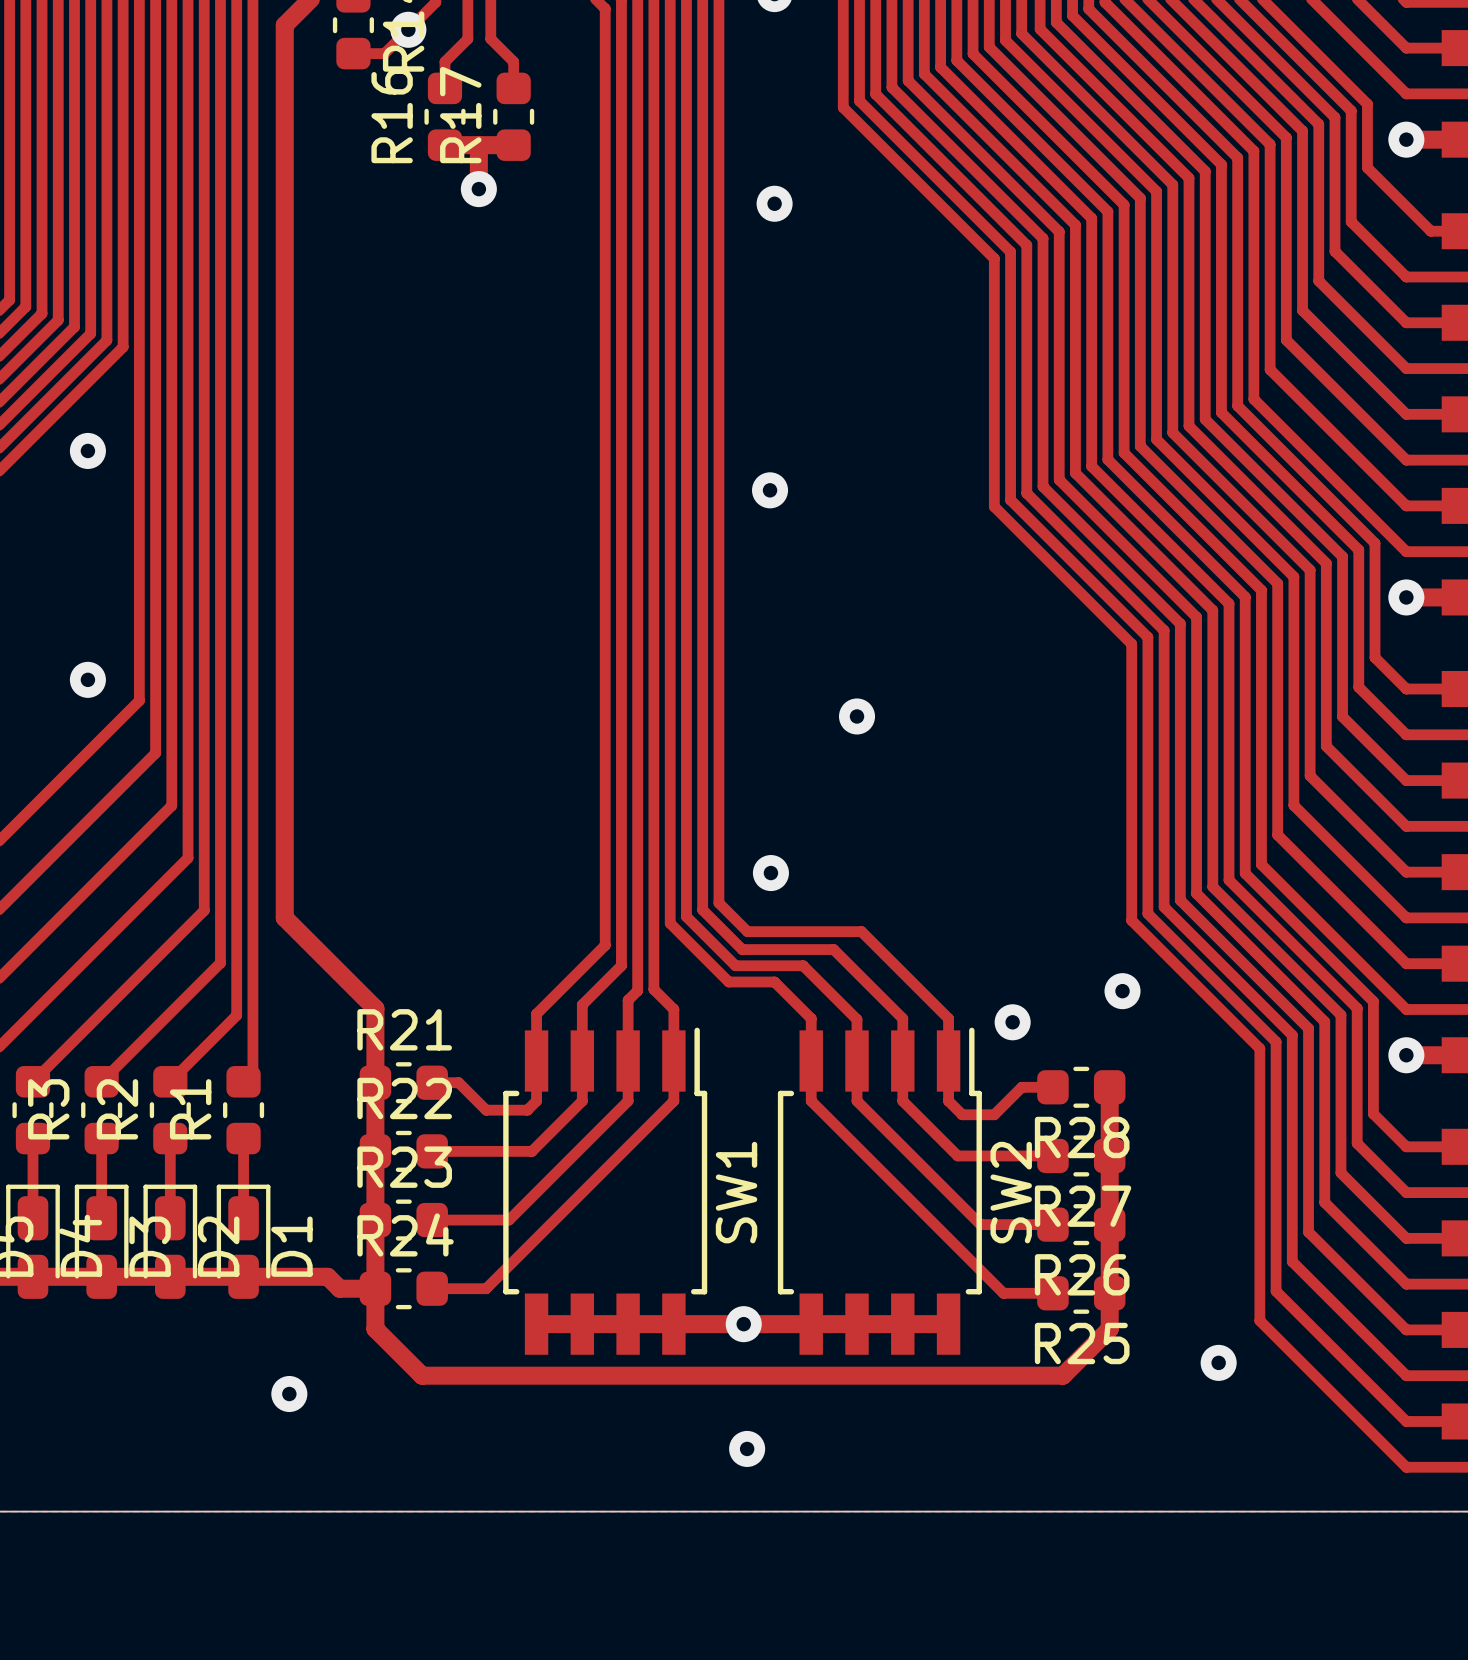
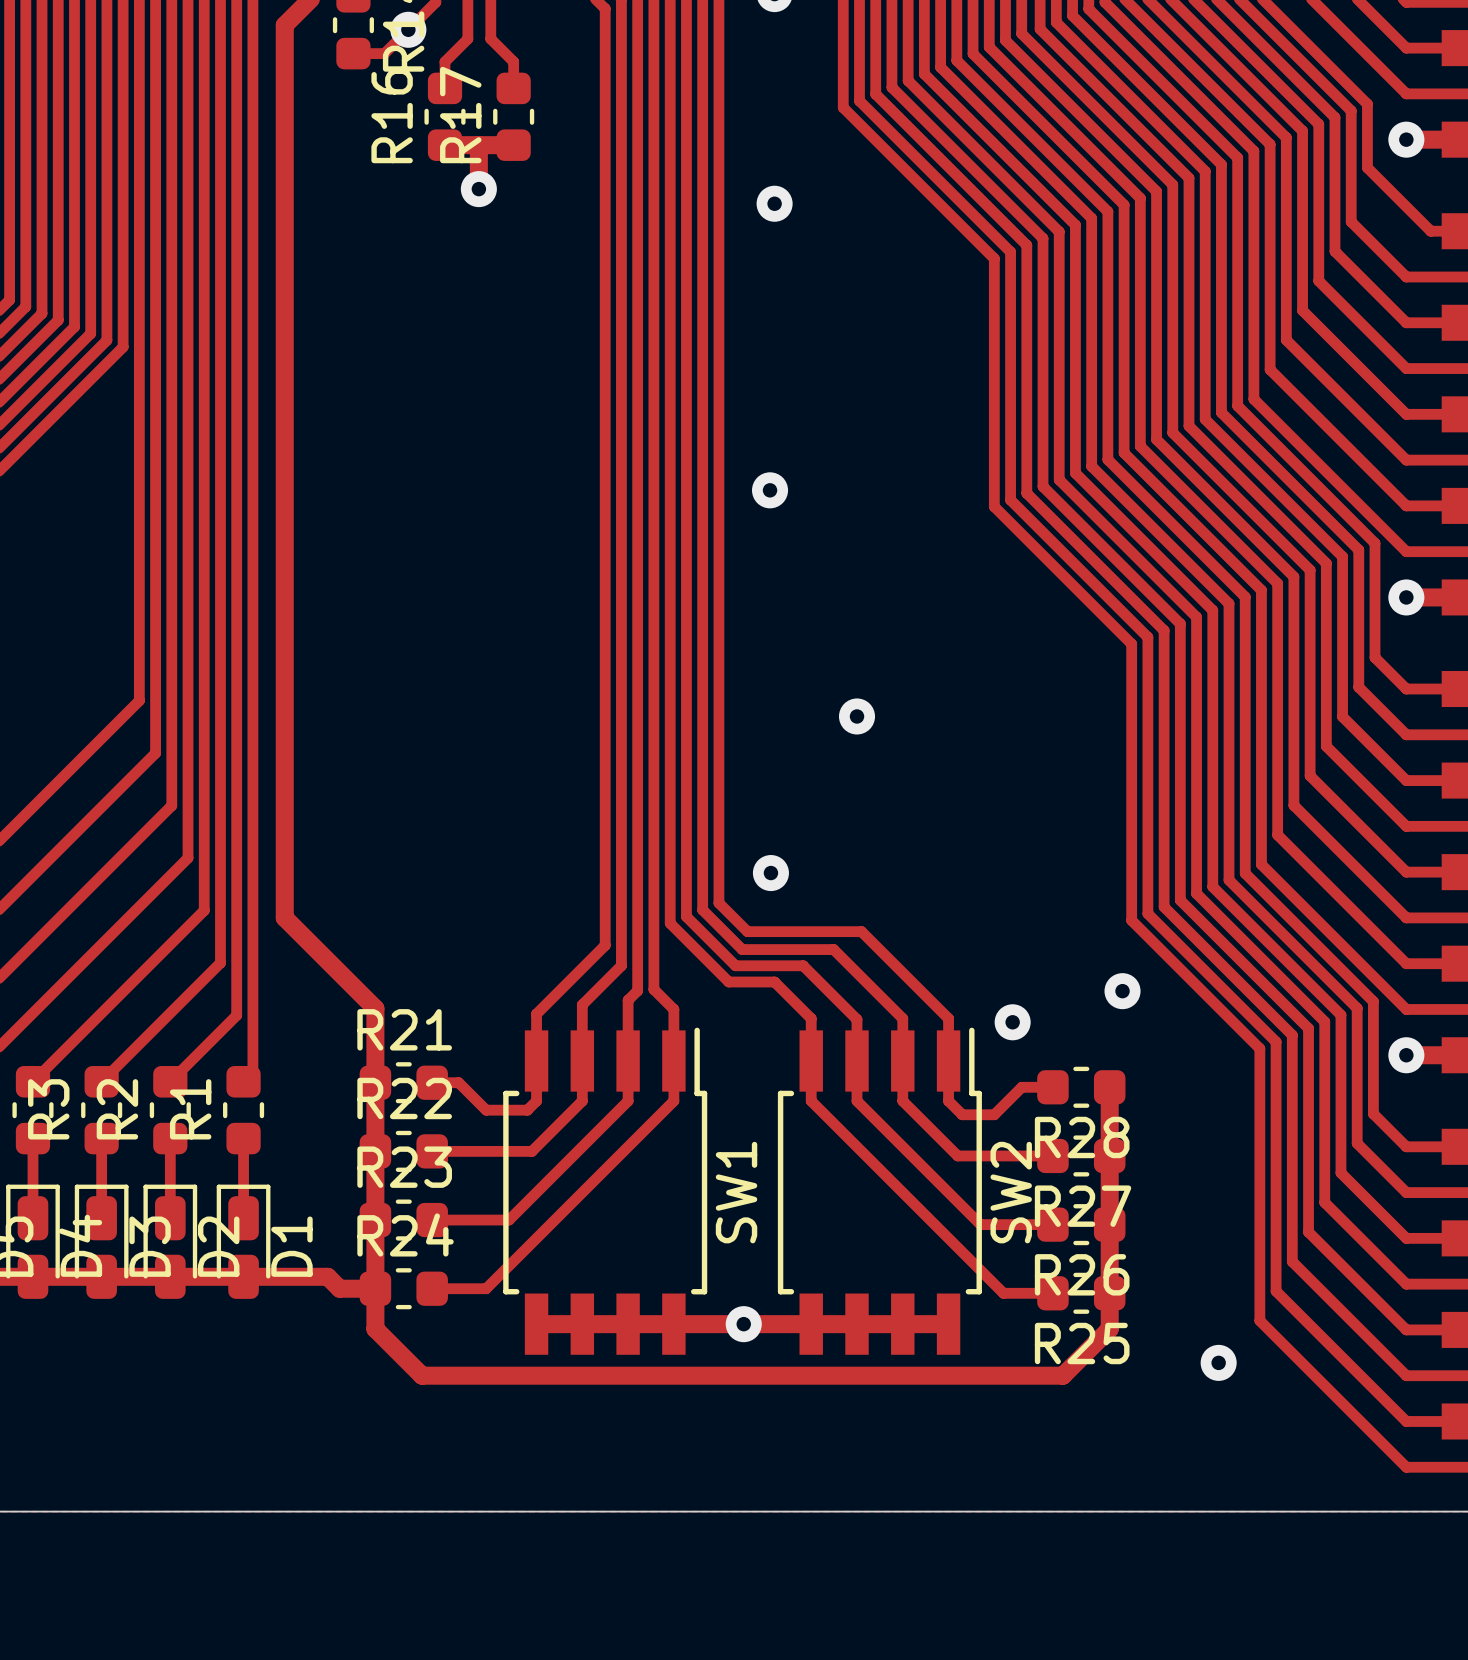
via: (87, 450) -> none
via: (87, 679) -> none
via: (289, 1394) -> none
via: (747, 1448) -> none

